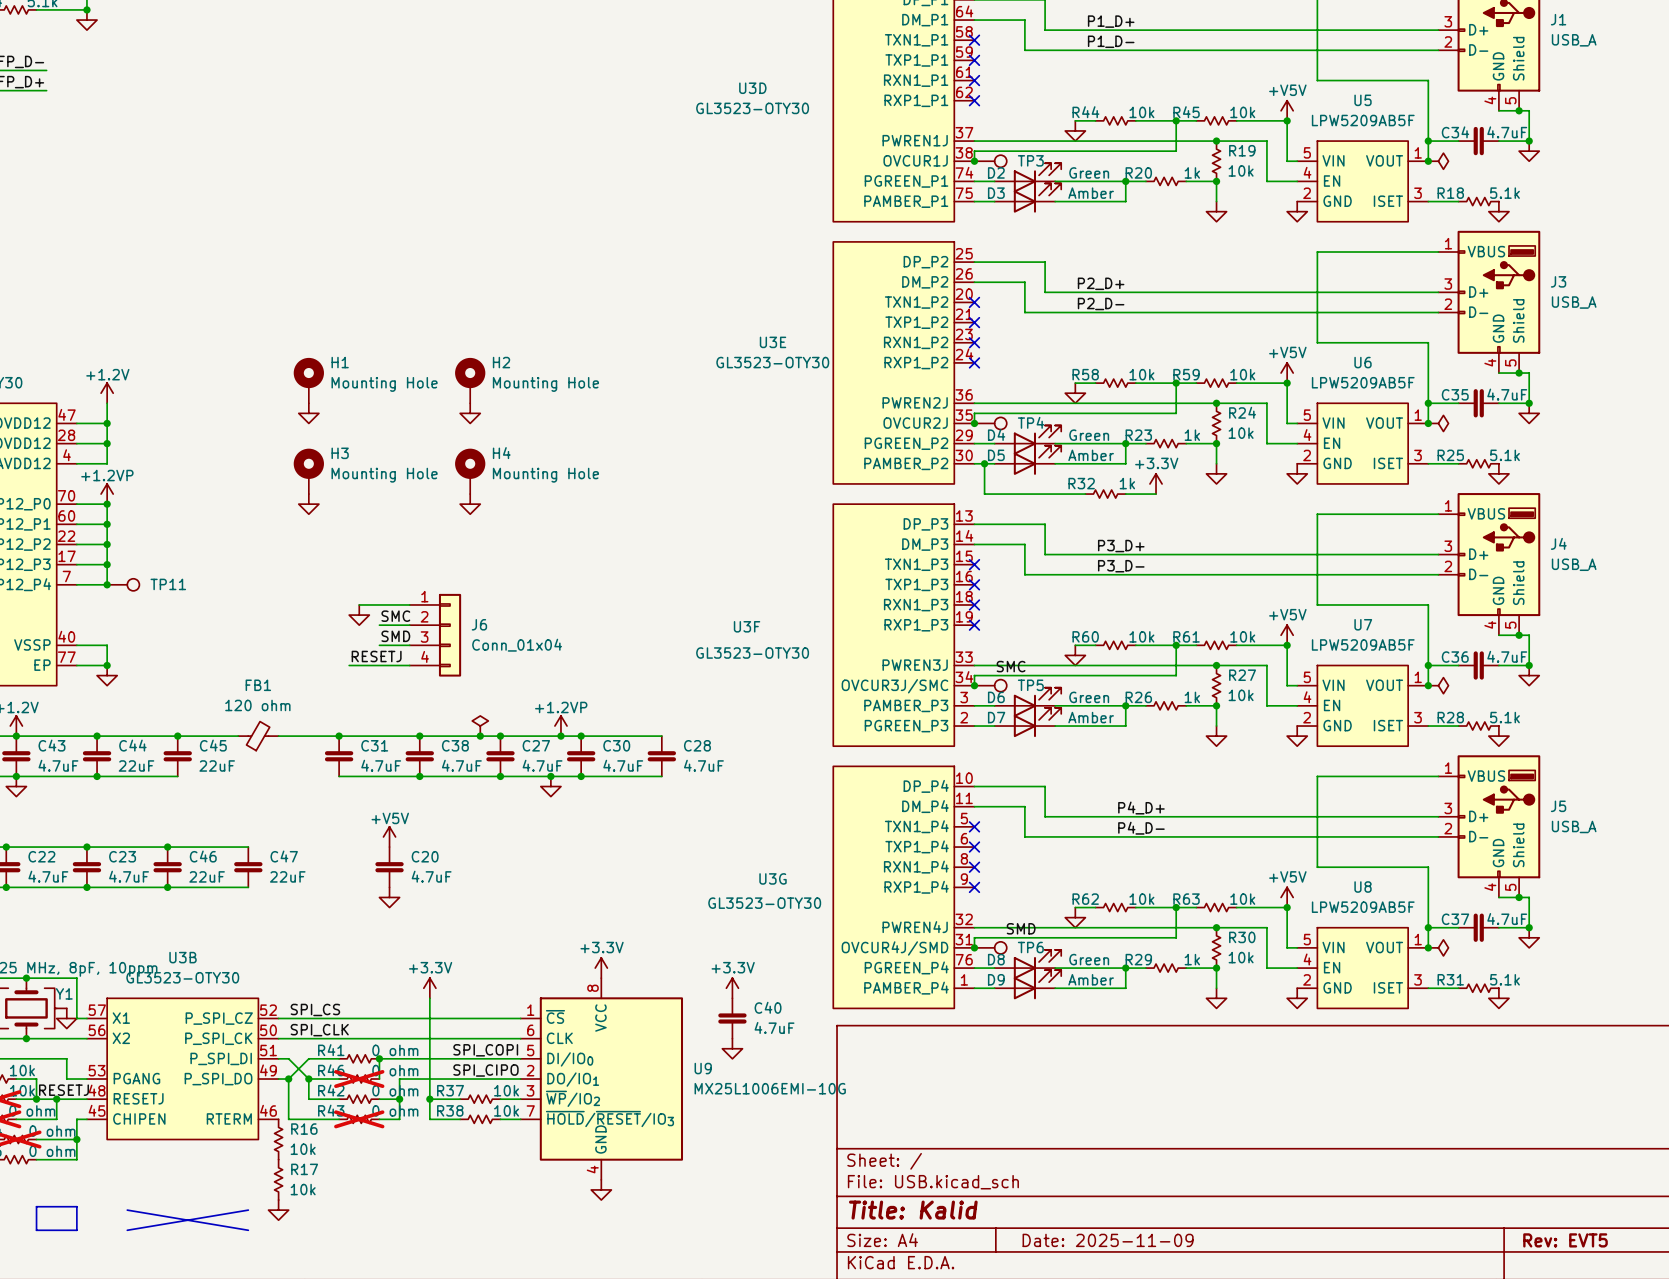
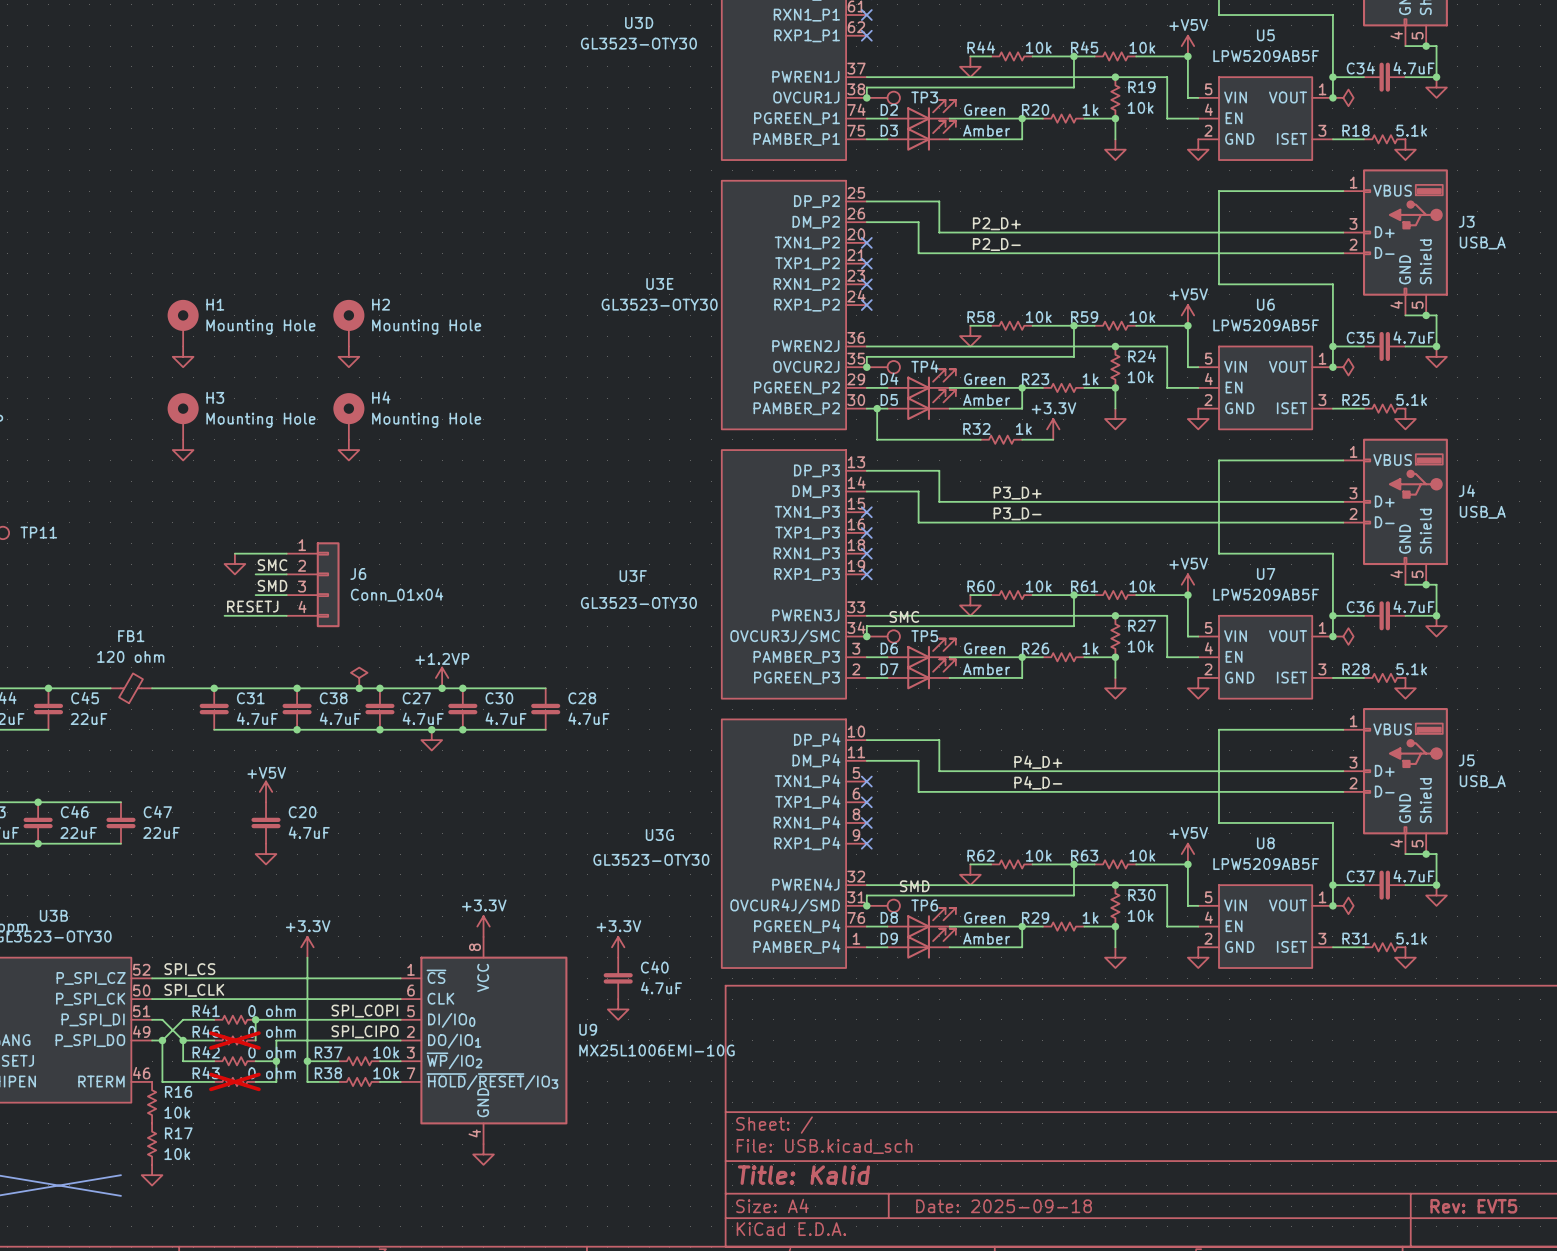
title block: Date: 2025-11-09 (1108, 1240) -> Date: 2025-09-18 (1004, 1206)

